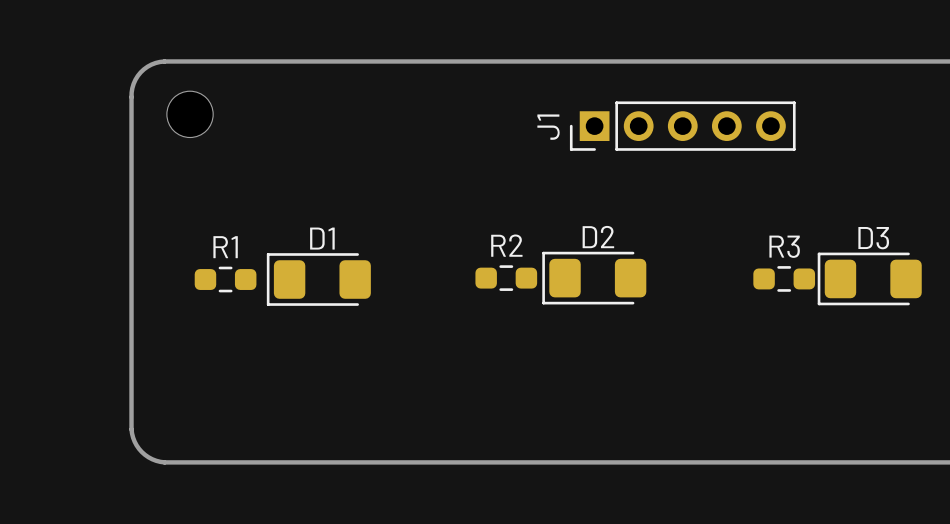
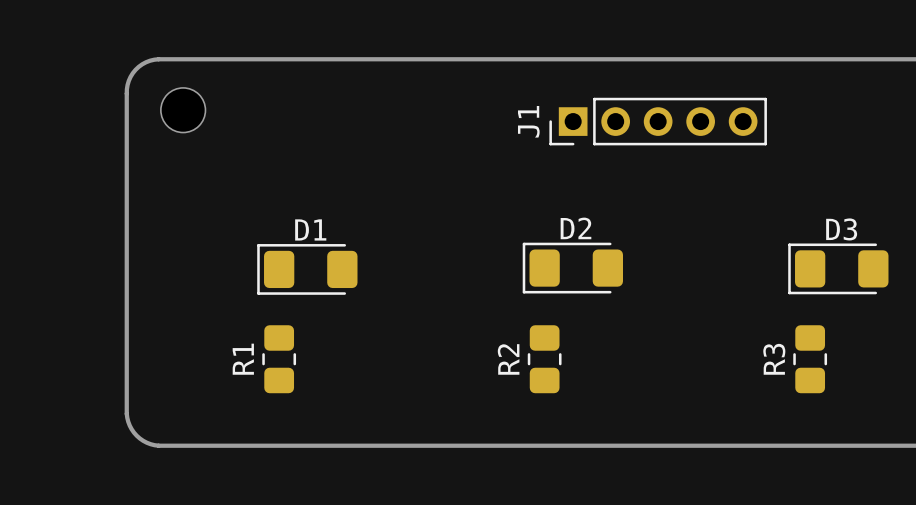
R2 name position: R2 (506, 245) -> R2 (508, 359)
R3 name position: R3 (784, 246) -> R3 (774, 359)
R1 name position: R1 (225, 247) -> R1 (243, 359)
R2 footprint: [475, 265, 538, 291] -> [527, 325, 562, 394]
R1 footprint: [194, 266, 257, 293] -> [262, 325, 297, 394]
R3 footprint: [753, 266, 816, 292] -> [793, 325, 828, 394]

